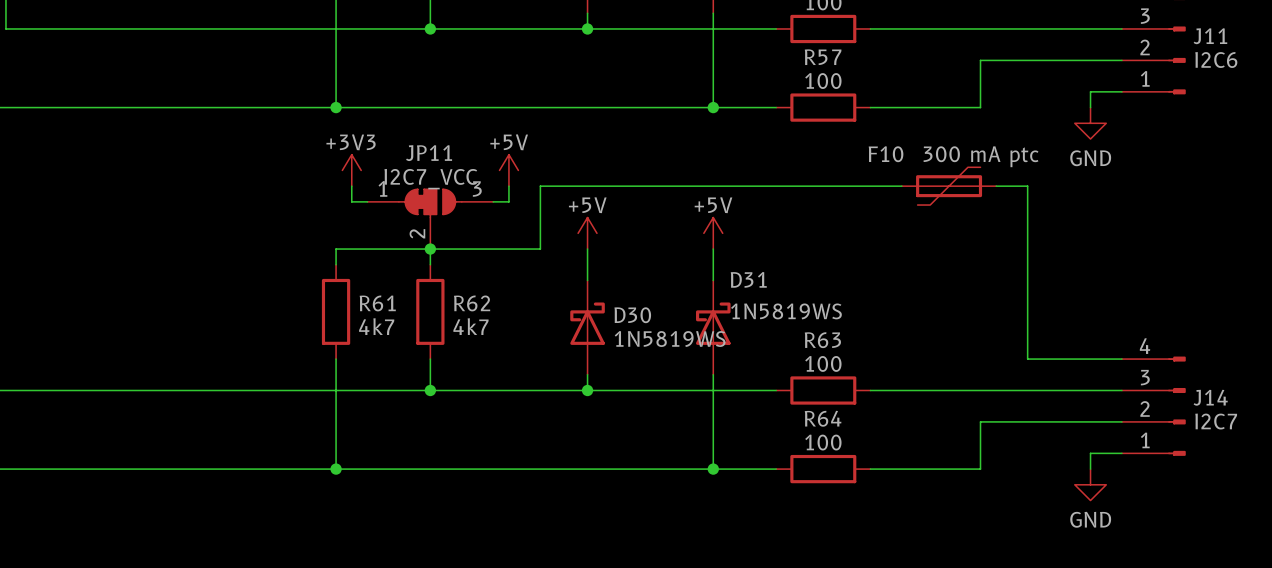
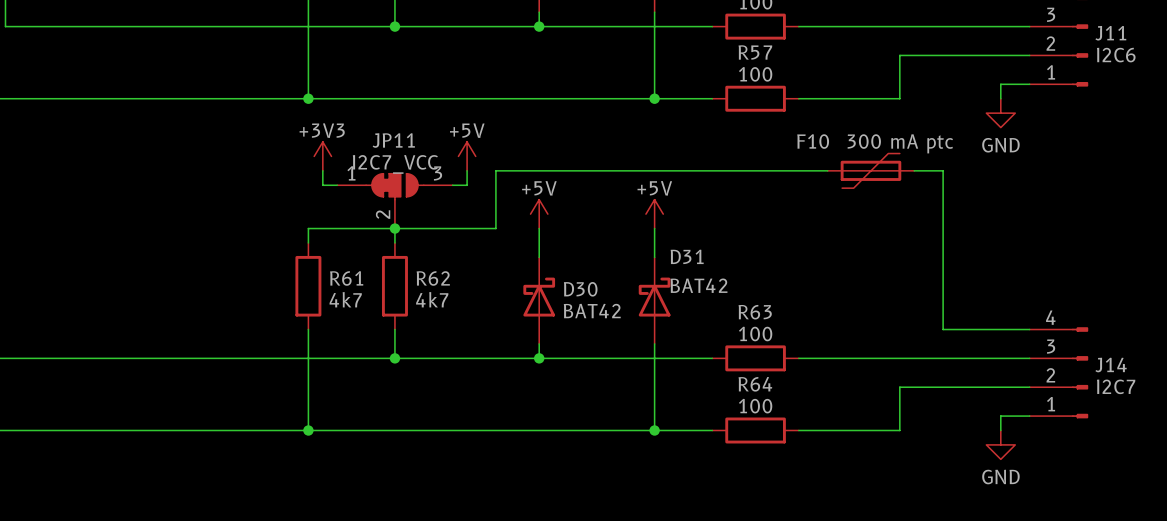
D31 value: 1N5819WS (786, 311) -> BAT42 (699, 285)
D30 value: 1N5819WS (670, 339) -> BAT42 (592, 311)

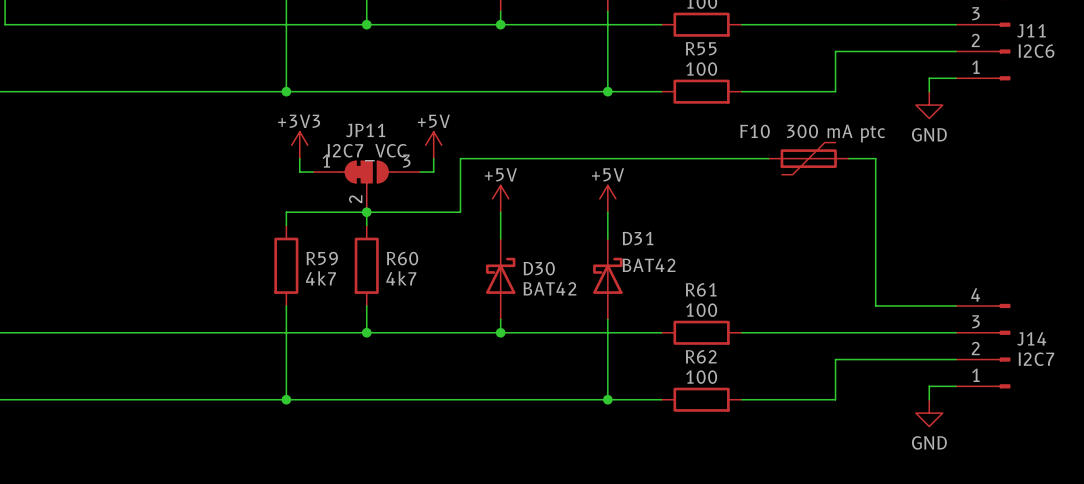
R57 name: R57 (755, 52) -> R55 (701, 48)
R61 name: R61 (346, 278) -> R59 (322, 258)
R62 name: R62 (433, 278) -> R60 (402, 258)
R63 name: R63 (755, 312) -> R61 (701, 289)
R64 name: R64 (755, 384) -> R62 (701, 356)

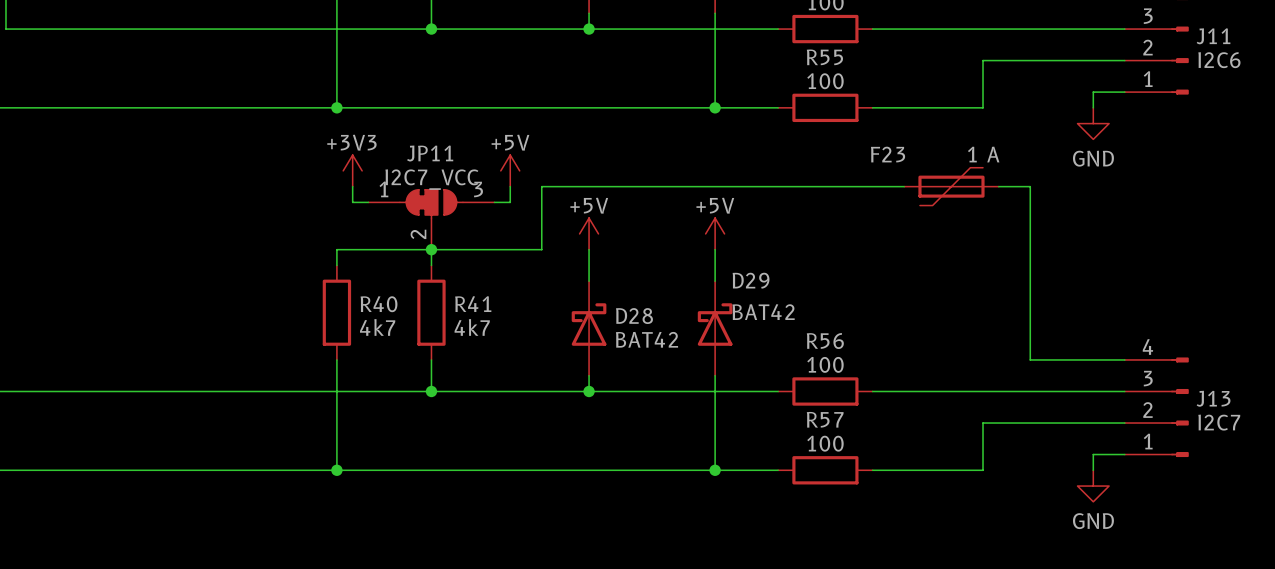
F10 name: F10 (755, 131) -> F23 (888, 154)
F10 value: 300 mA ptc (835, 133) -> 1 A (983, 154)
D31 name: D31 (638, 238) -> D29 (751, 280)
R59 name: R59 (322, 258) -> R40 (379, 304)
R60 name: R60 (402, 258) -> R41 (473, 304)
D30 name: D30 (539, 268) -> D28 (634, 316)
R61 name: R61 (701, 289) -> R56 (825, 341)
J14 name: J14 (1031, 338) -> J13 (1213, 398)
R62 name: R62 (701, 356) -> R57 (825, 419)

